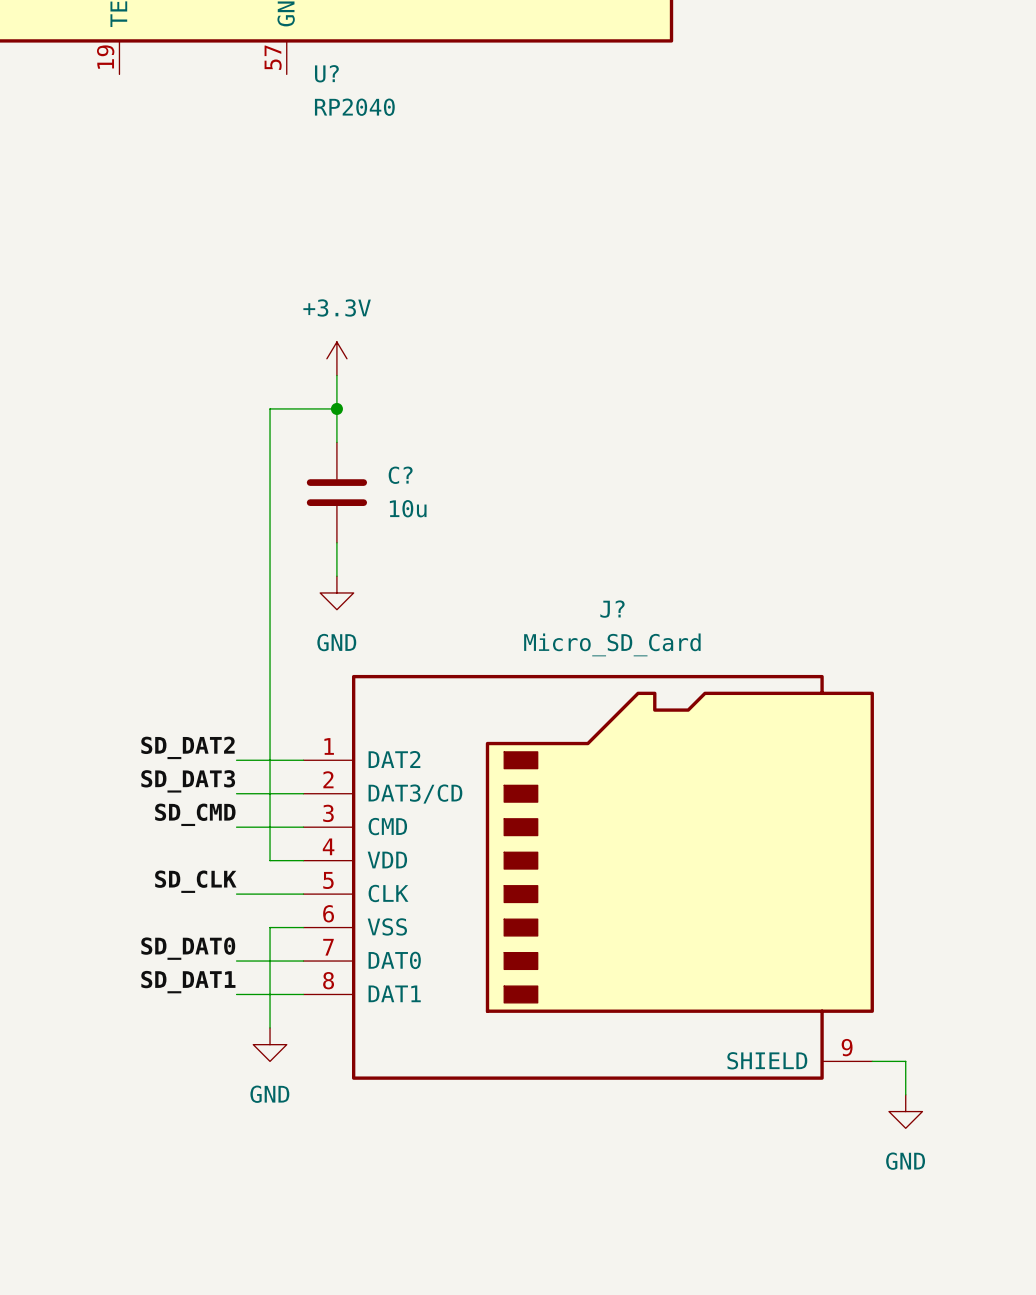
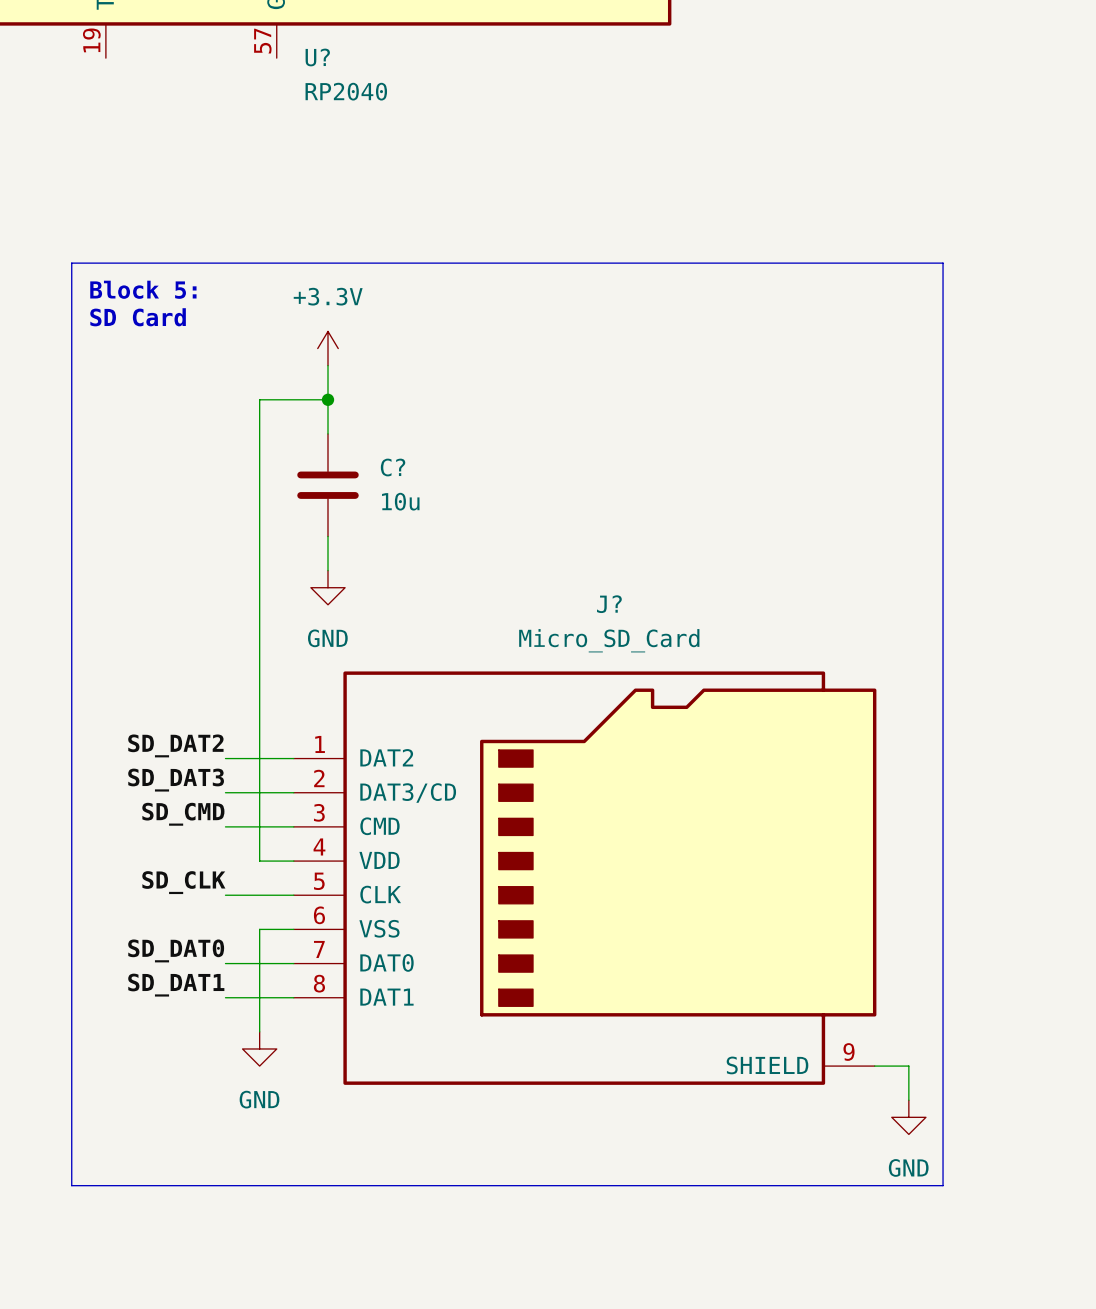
line: none -> (71, 263) (943, 263) (943, 1185) (71, 1185) (71, 263)
text: none -> Block 5: (143, 289)
text: none -> SD Card (138, 317)

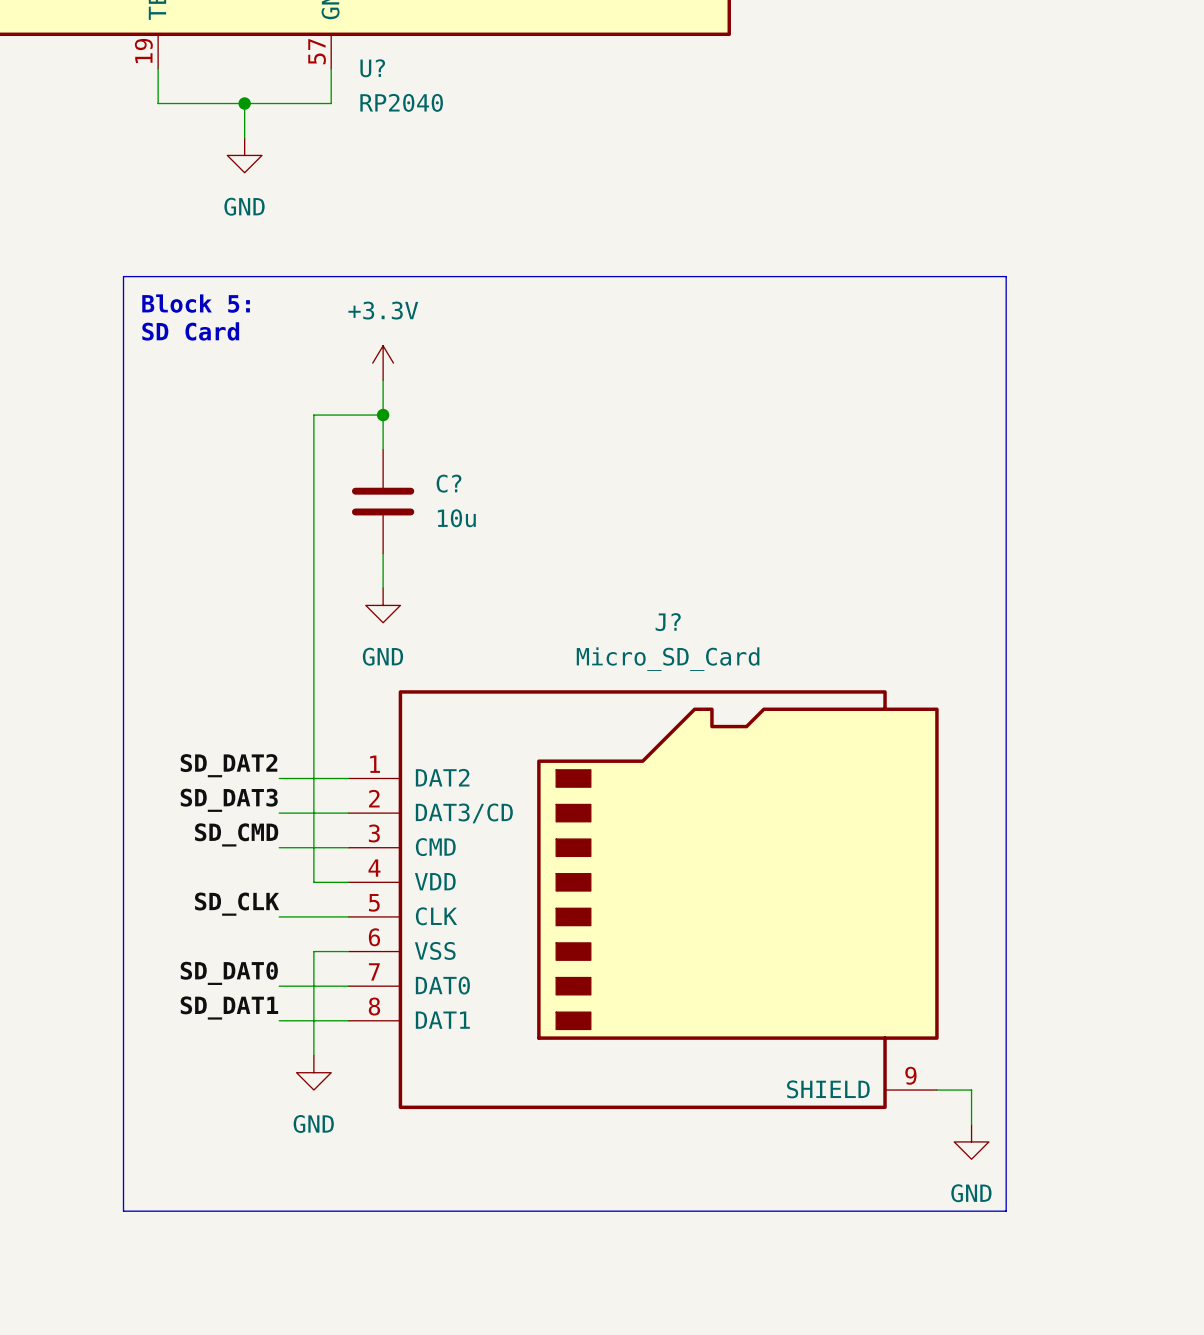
wire: none -> (158, 68) (158, 103) (331, 103) (331, 68)
wire: none -> (244, 103) (244, 138)
junction: none -> (244, 103)
power symbol: none -> GND (244, 155)

